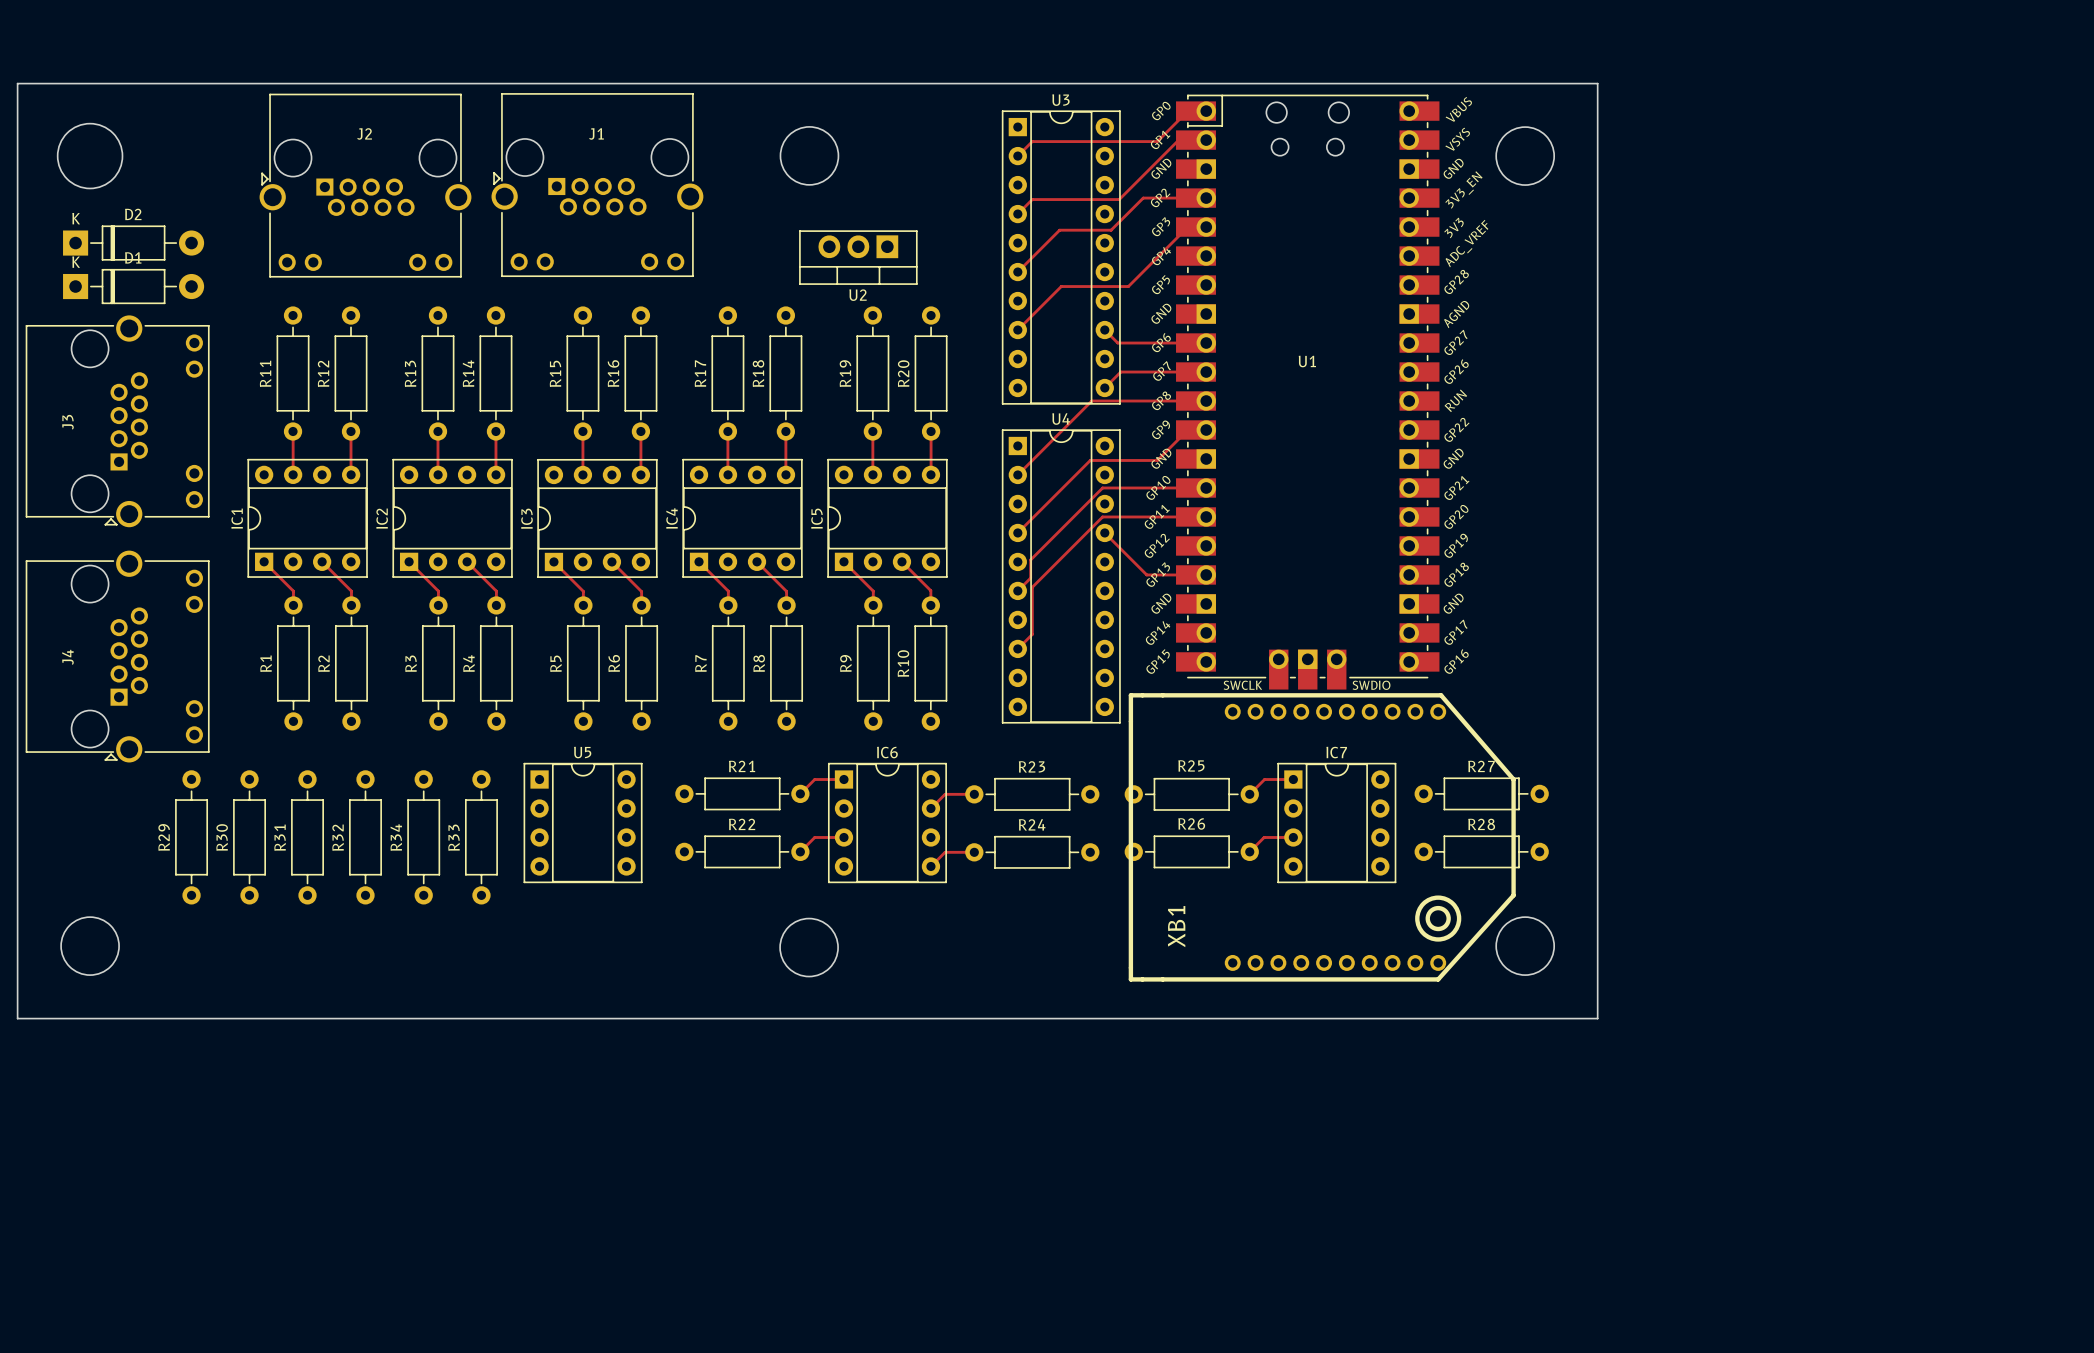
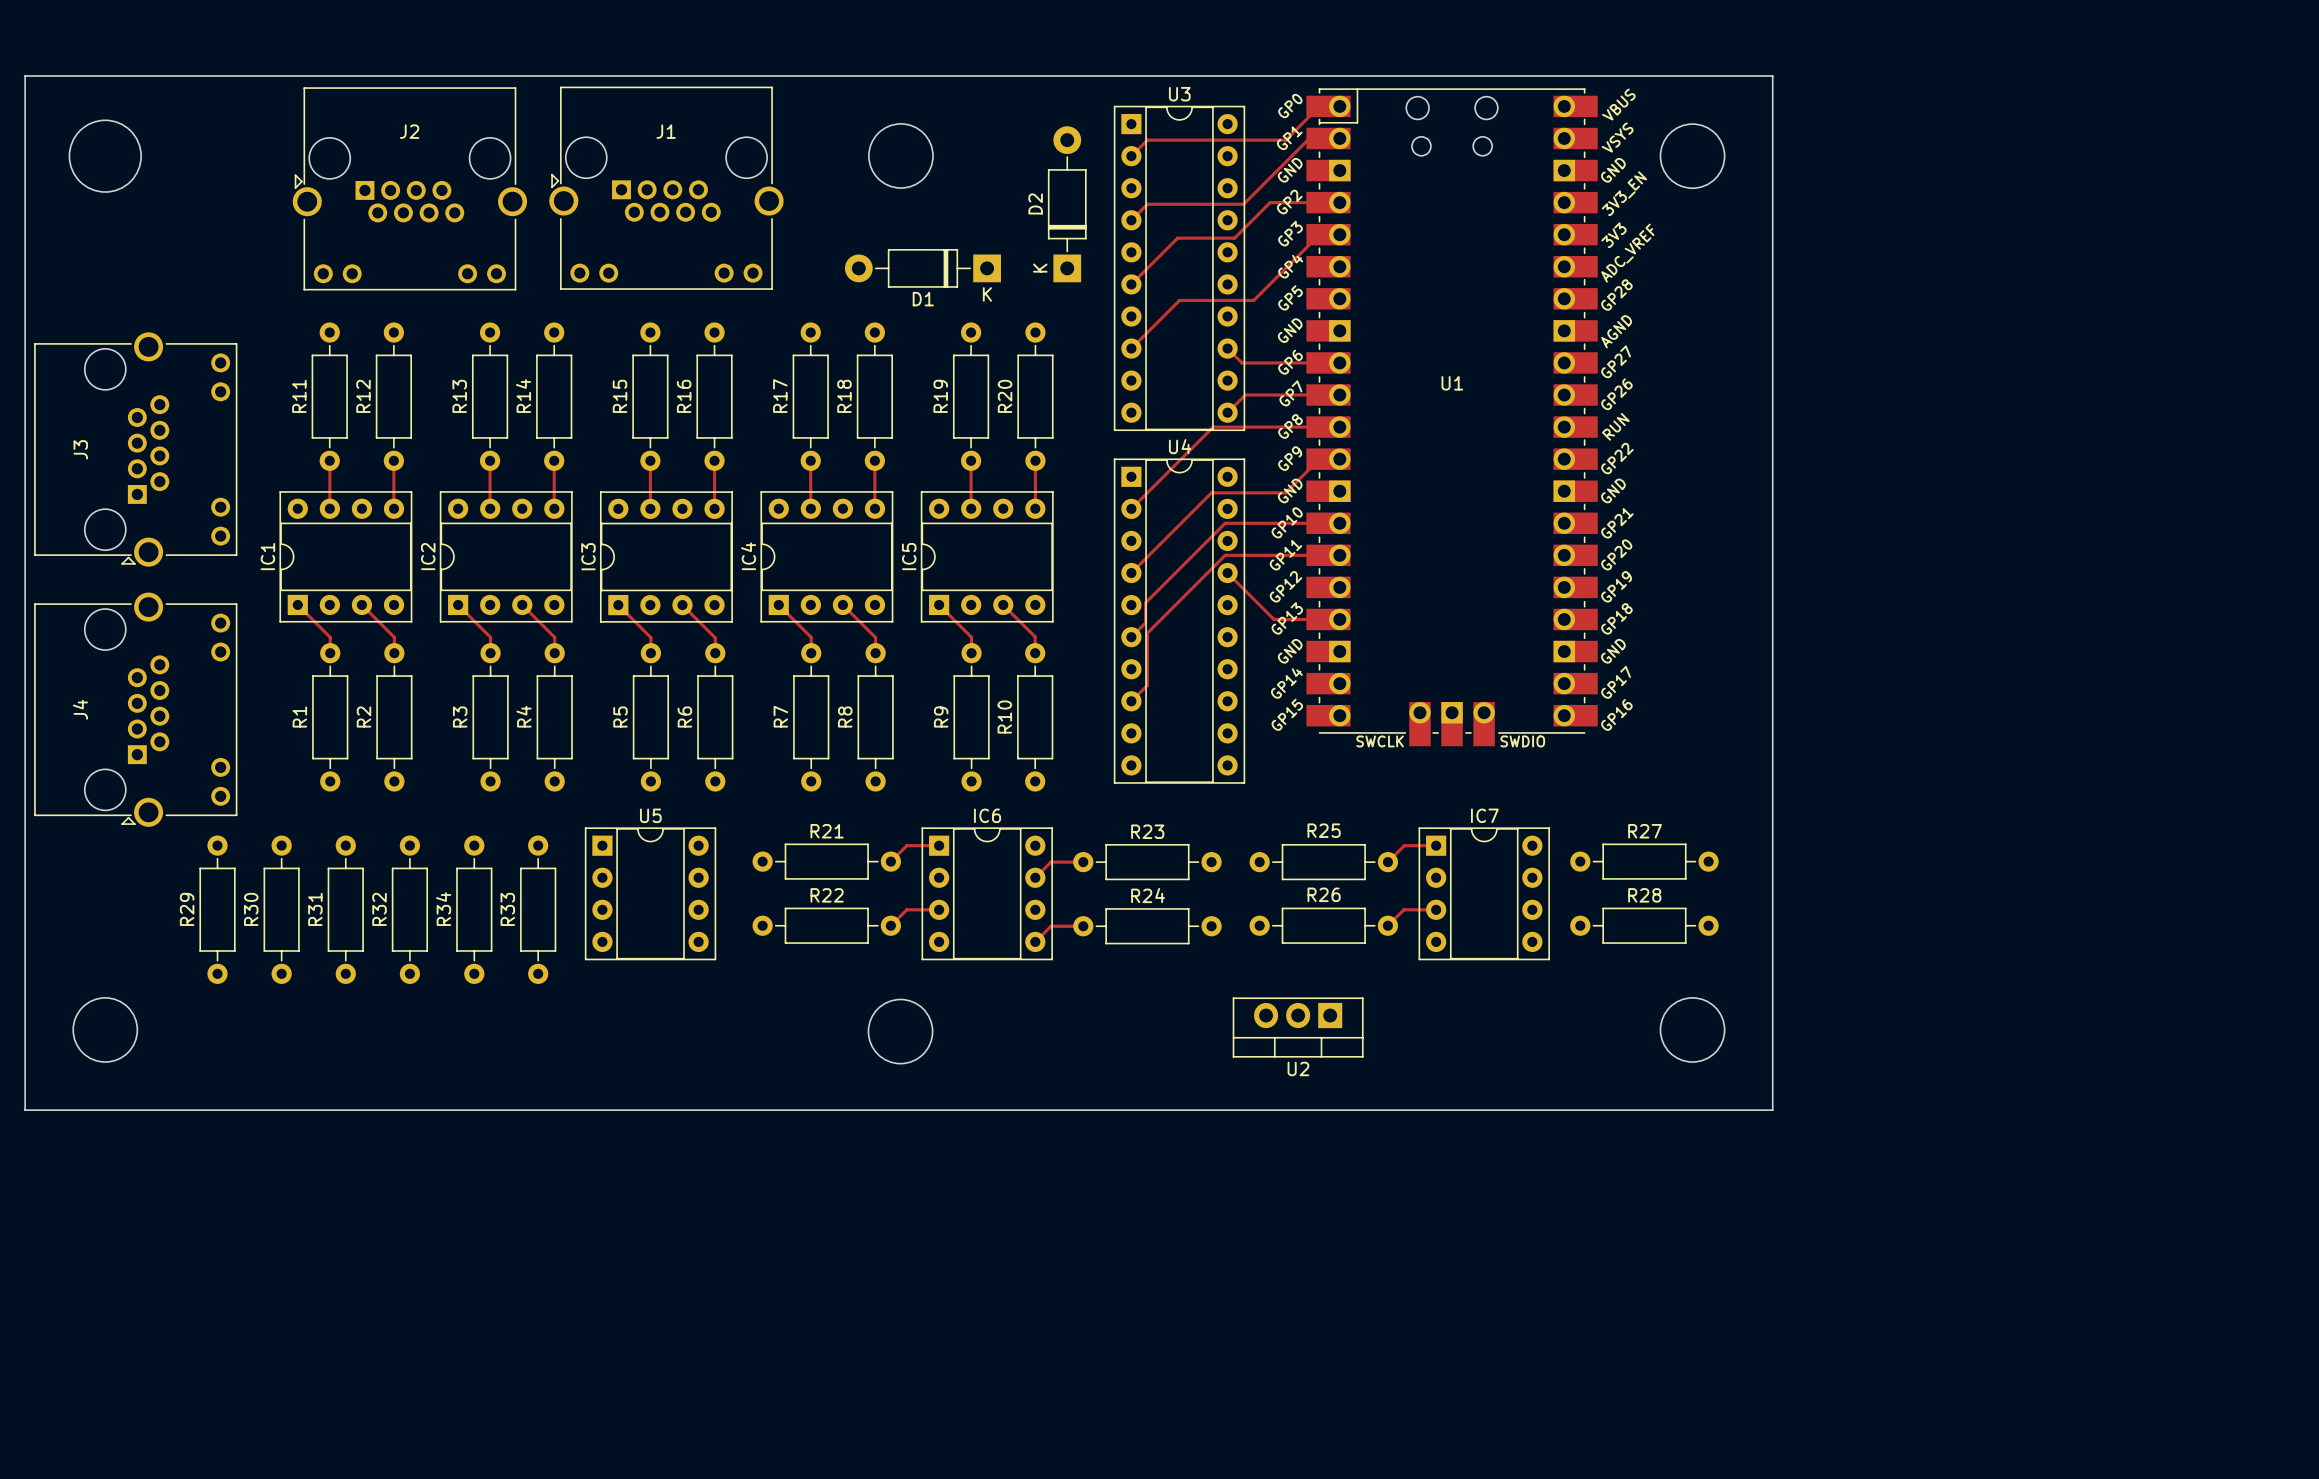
D2 rotation: 0° (133, 243) -> 90° counterclockwise (1067, 204)
D2 position: (133, 243) -> (1067, 204)
U2 position: (858, 257) -> (1298, 1027)
D1 rotation: 0° (133, 286) -> 180° (922, 268)
D1 position: (133, 286) -> (922, 268)
XB1: (1322, 837) -> none

